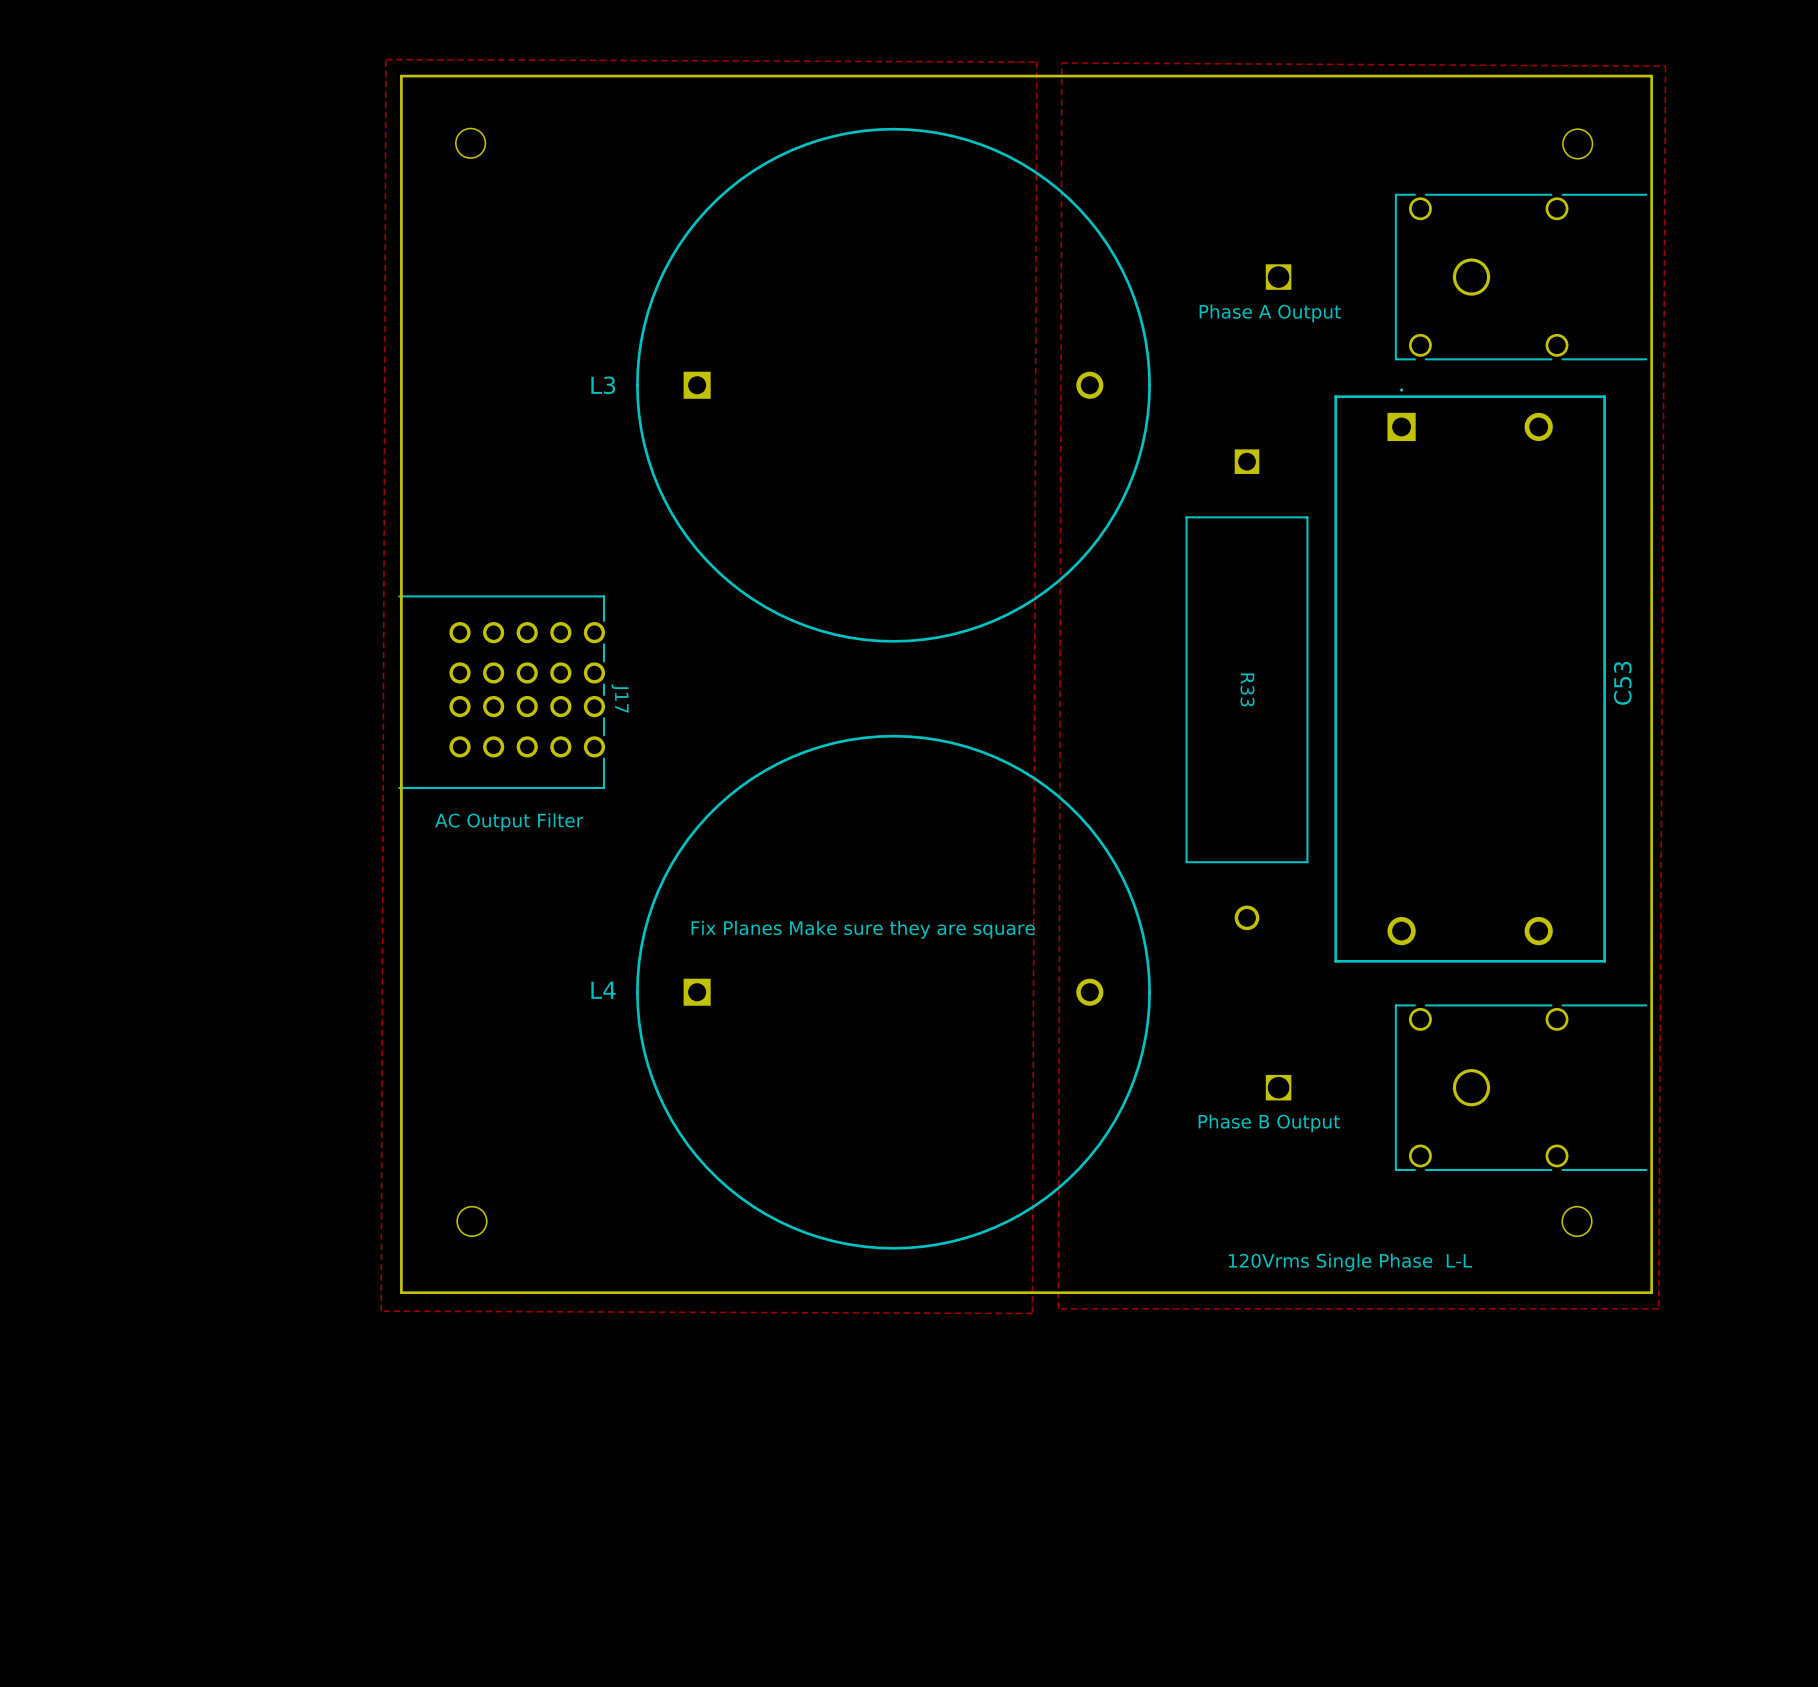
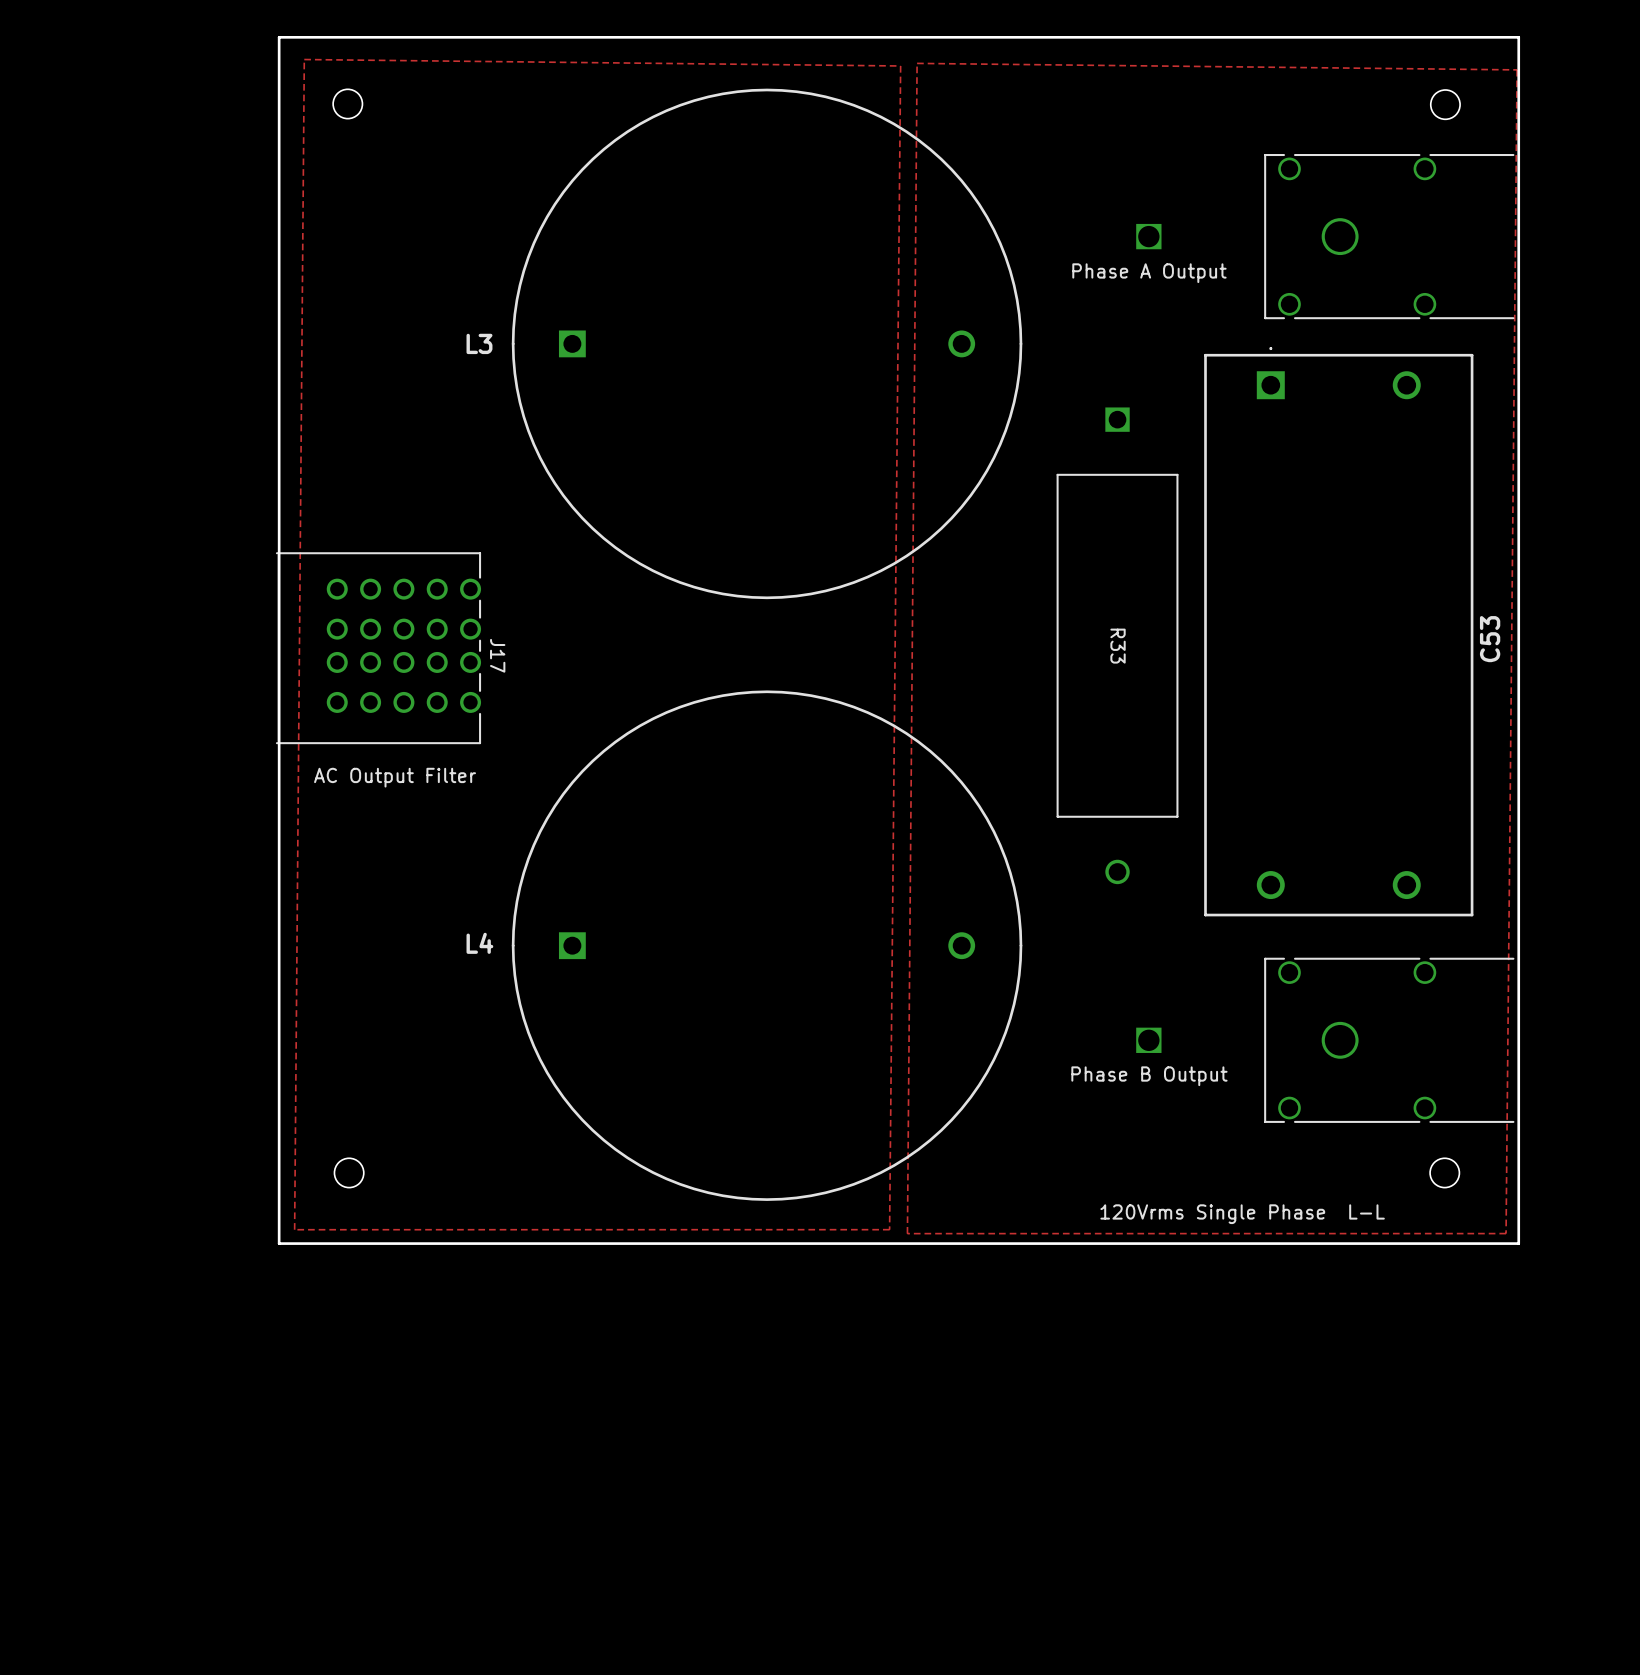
zone outline: (385, 59) (1036, 62) (1032, 1313) (381, 1311) (385, 59) -> (304, 59) (294, 1229) (889, 1229) (900, 65) (304, 59)
zone outline: (1061, 62) (1665, 66) (1658, 1308) (1058, 1308) (1061, 62) -> (917, 63) (907, 1233) (1506, 1233) (1517, 69) (917, 63)
text: Fix Planes Make sure they are square (863, 929) -> none

